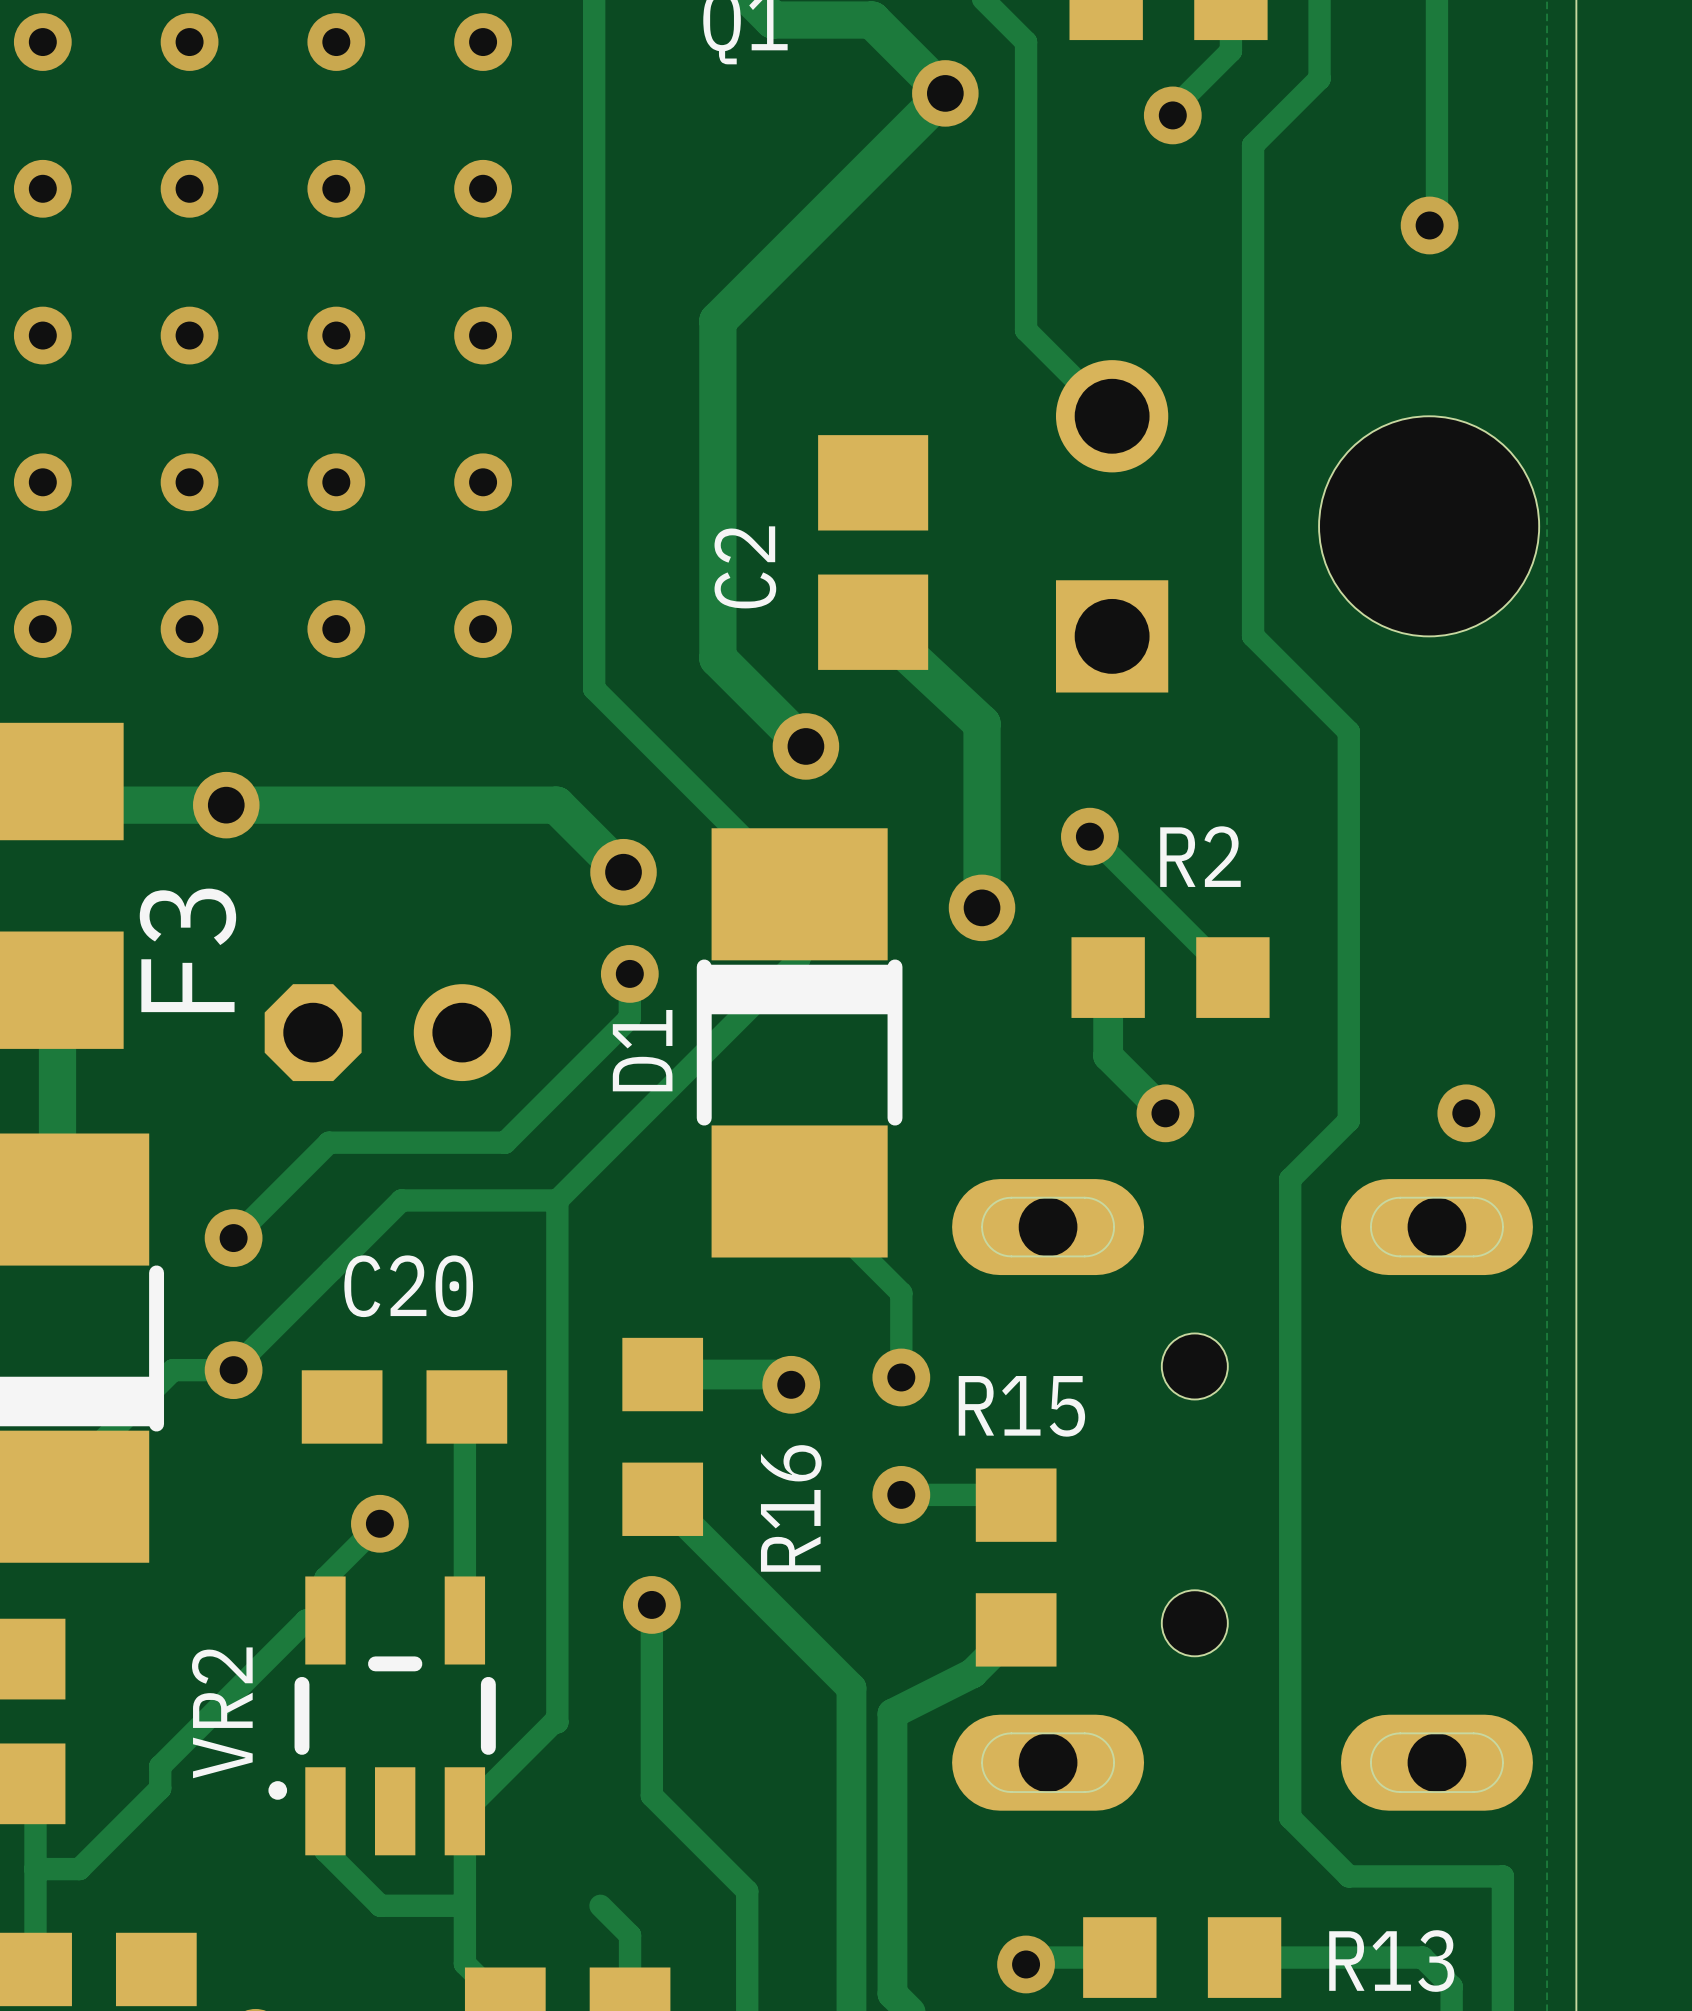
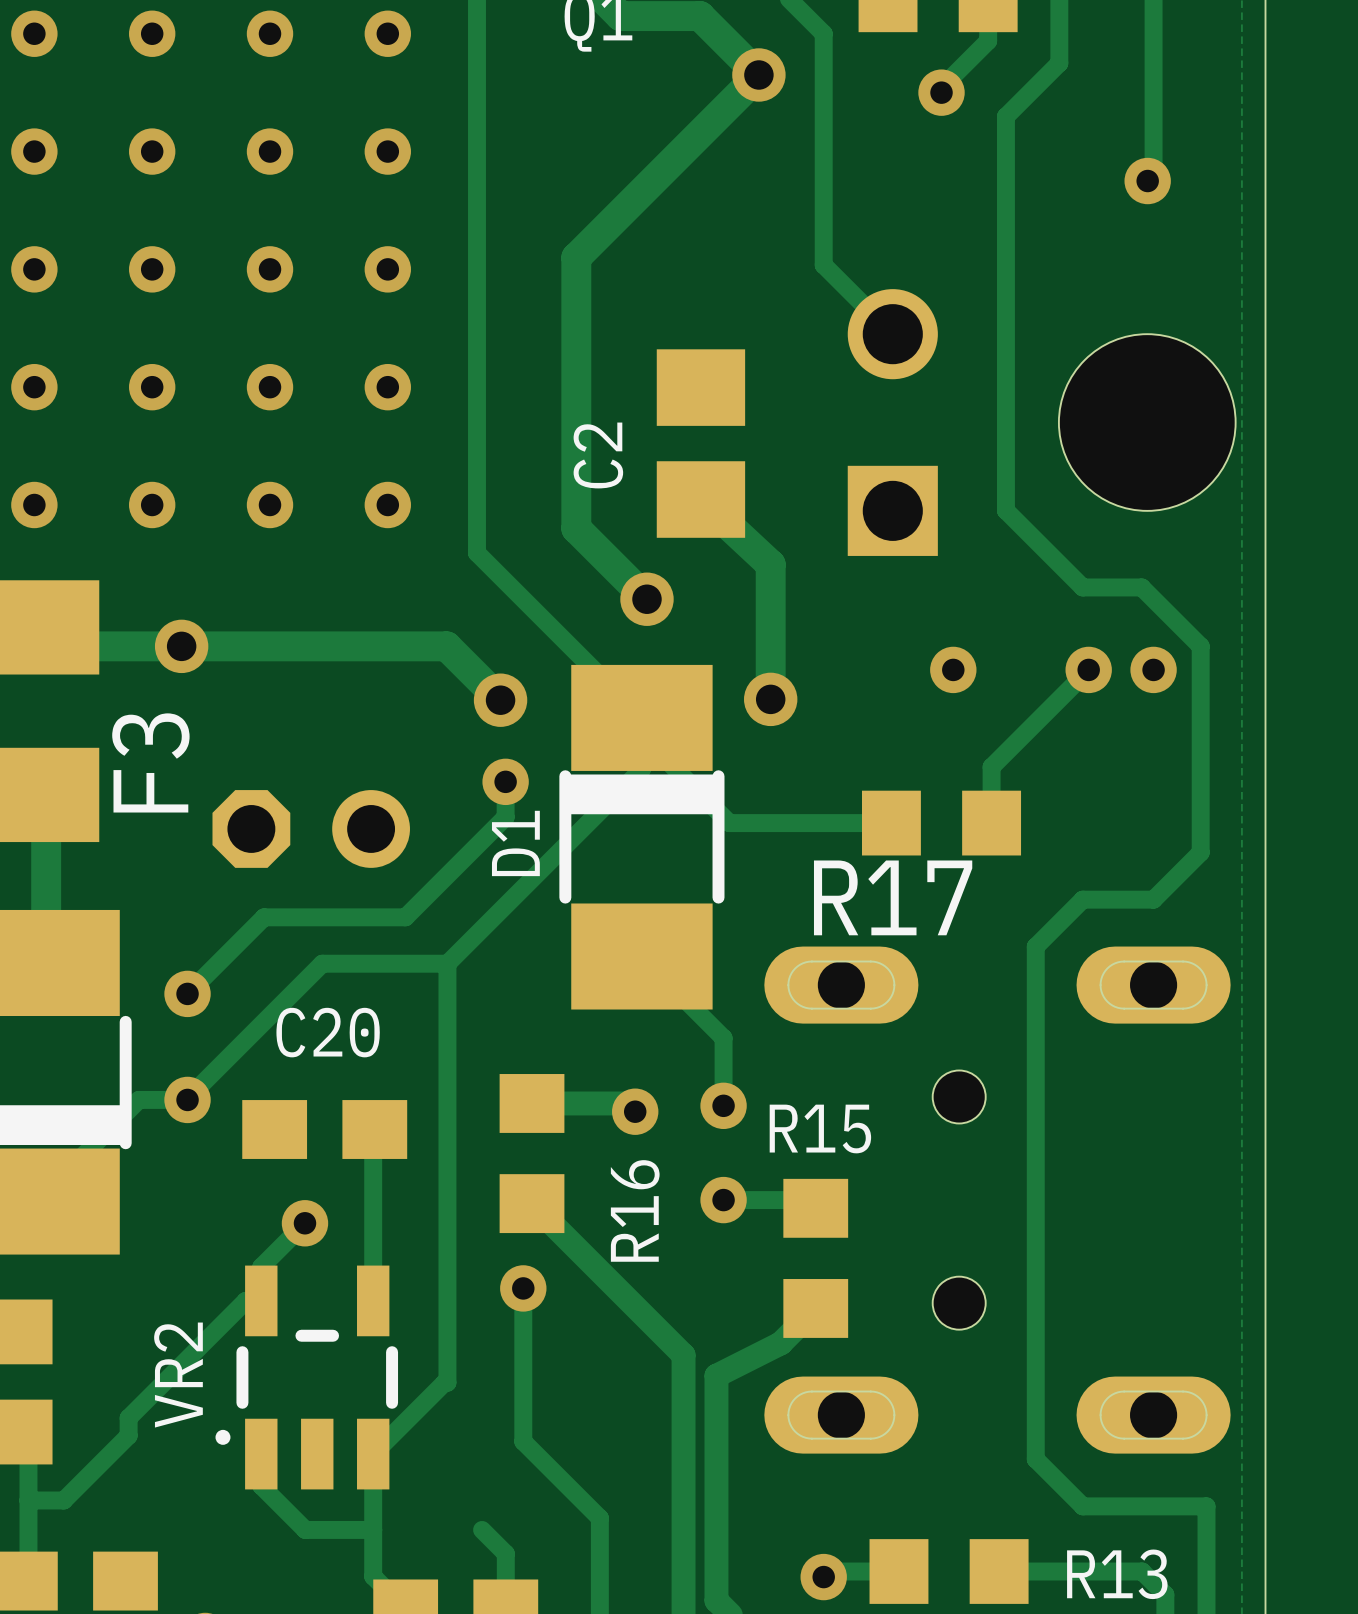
track: (960, 703) (982, 723) (982, 907) -> (770, 564) (770, 699)
track: (1348, 731) (1348, 1120) -> (1082, 587) (1141, 587) (1200, 646) (1200, 852) (1153, 899) (1082, 899)
track: none -> (1088, 669) (991, 767) (991, 823)
via: none -> (1088, 669)
via: none -> (1153, 669)
track: (1089, 836) (1232, 977) -> none
via position: (1089, 836) -> (953, 669)
R2 name: R2 (1200, 856) -> R17 (893, 897)
track: none -> (632, 708) (632, 725) (729, 823) (891, 823)
via position: (982, 907) -> (770, 699)
track: (1108, 977) (1108, 1056) (1165, 1113) -> none
R2 position: (1170, 977) -> (941, 823)
via: (1165, 1113) -> none
via: (1466, 1113) -> none

